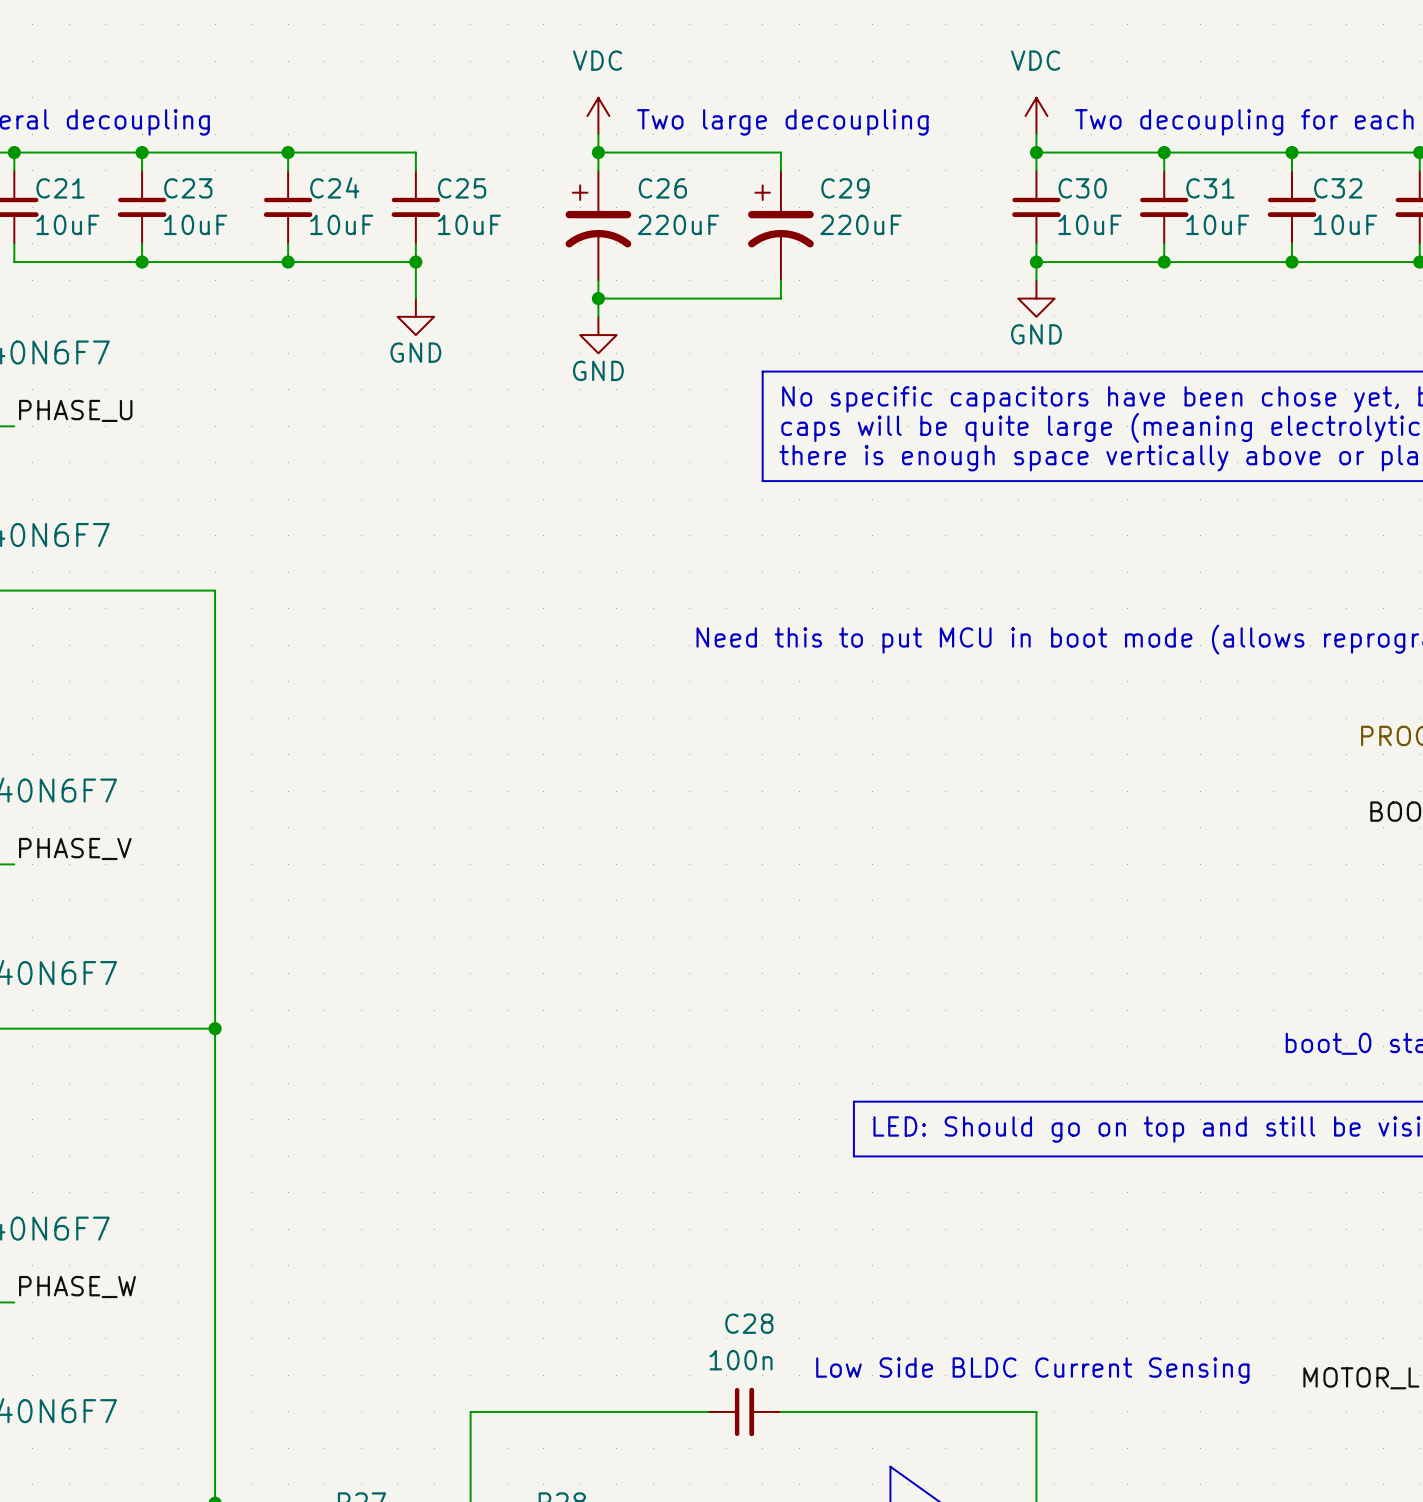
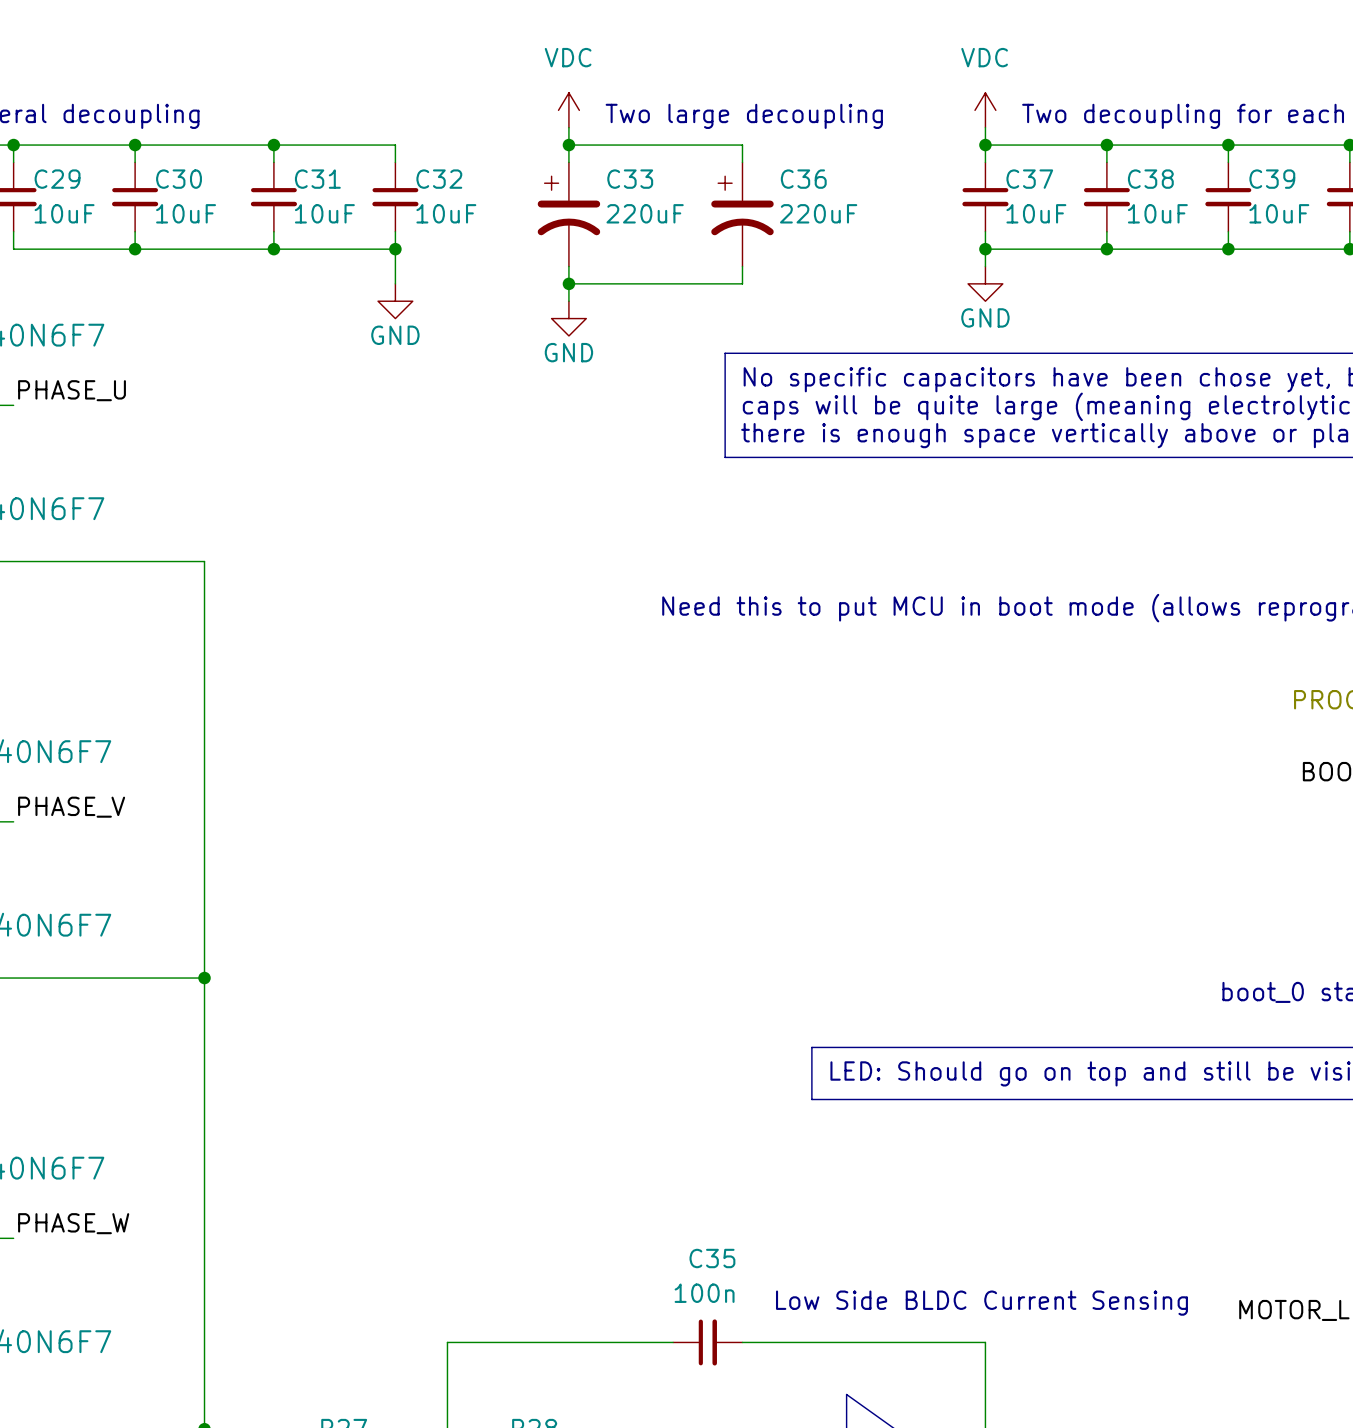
C24 name: C24 (334, 187) -> C31 (317, 179)
C21 name: C21 (60, 188) -> C29 (57, 179)
C23 name: C23 (188, 188) -> C30 (179, 179)
C25 name: C25 (462, 188) -> C32 (439, 179)
C26 name: C26 (662, 188) -> C33 (630, 179)
C29 name: C29 (845, 188) -> C36 (803, 179)
C30 name: C30 (1082, 188) -> C37 (1029, 179)
C31 name: C31 (1210, 188) -> C38 (1150, 179)
C32 name: C32 (1338, 188) -> C39 (1272, 179)
C28 name: C28 (749, 1323) -> C35 (712, 1258)

